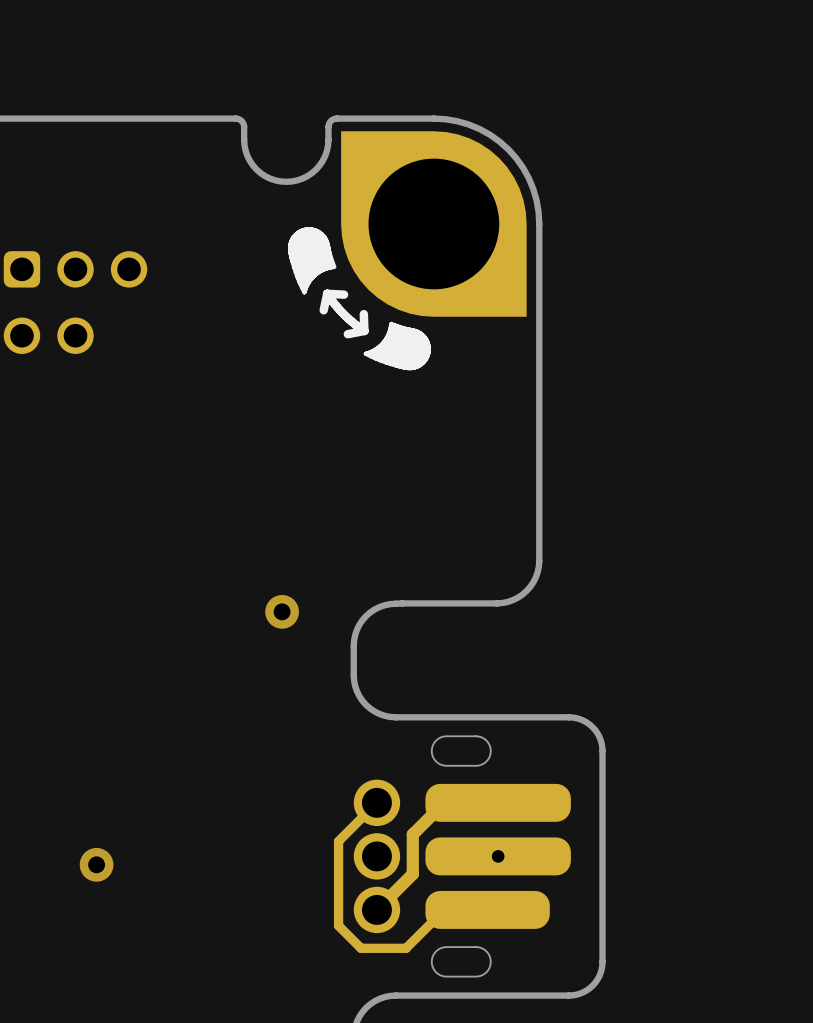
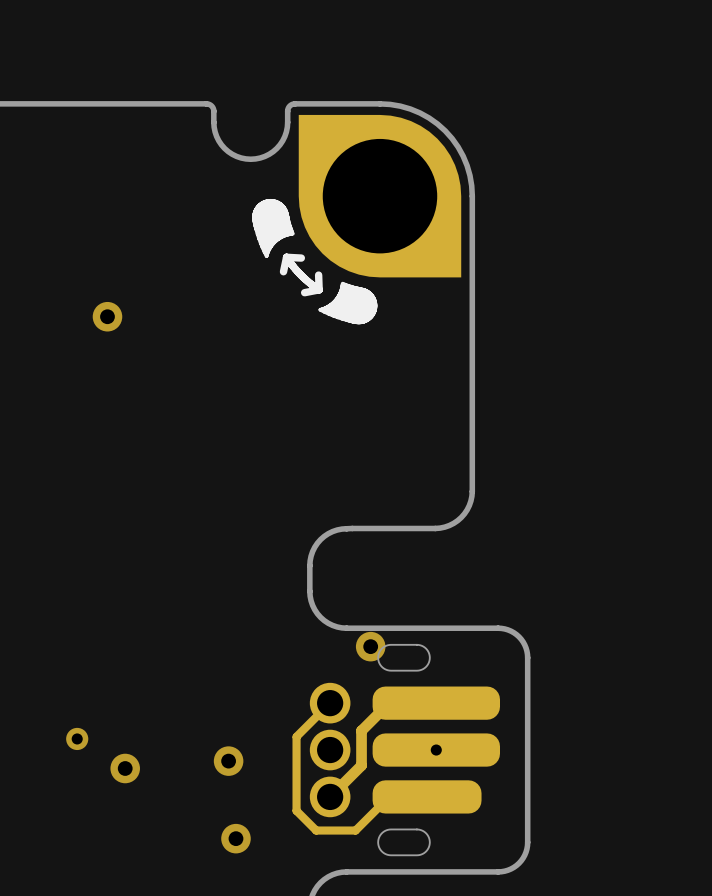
part: (75, 302) -> none
via: none -> (107, 316)
via: (282, 611) -> none
via: none -> (370, 646)
via: none -> (77, 738)
via position: (96, 864) -> (125, 768)
via: none -> (228, 761)
via: none -> (235, 838)

